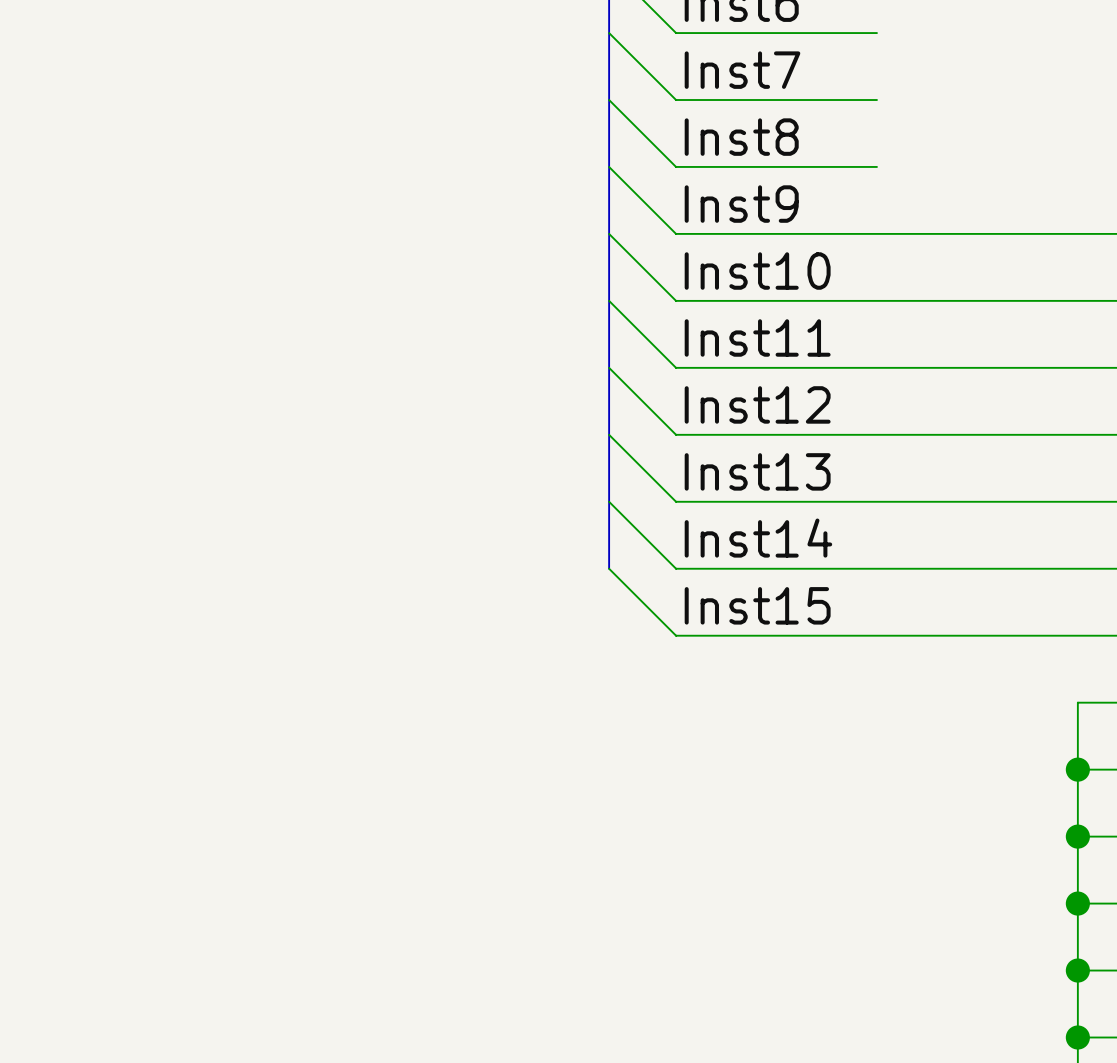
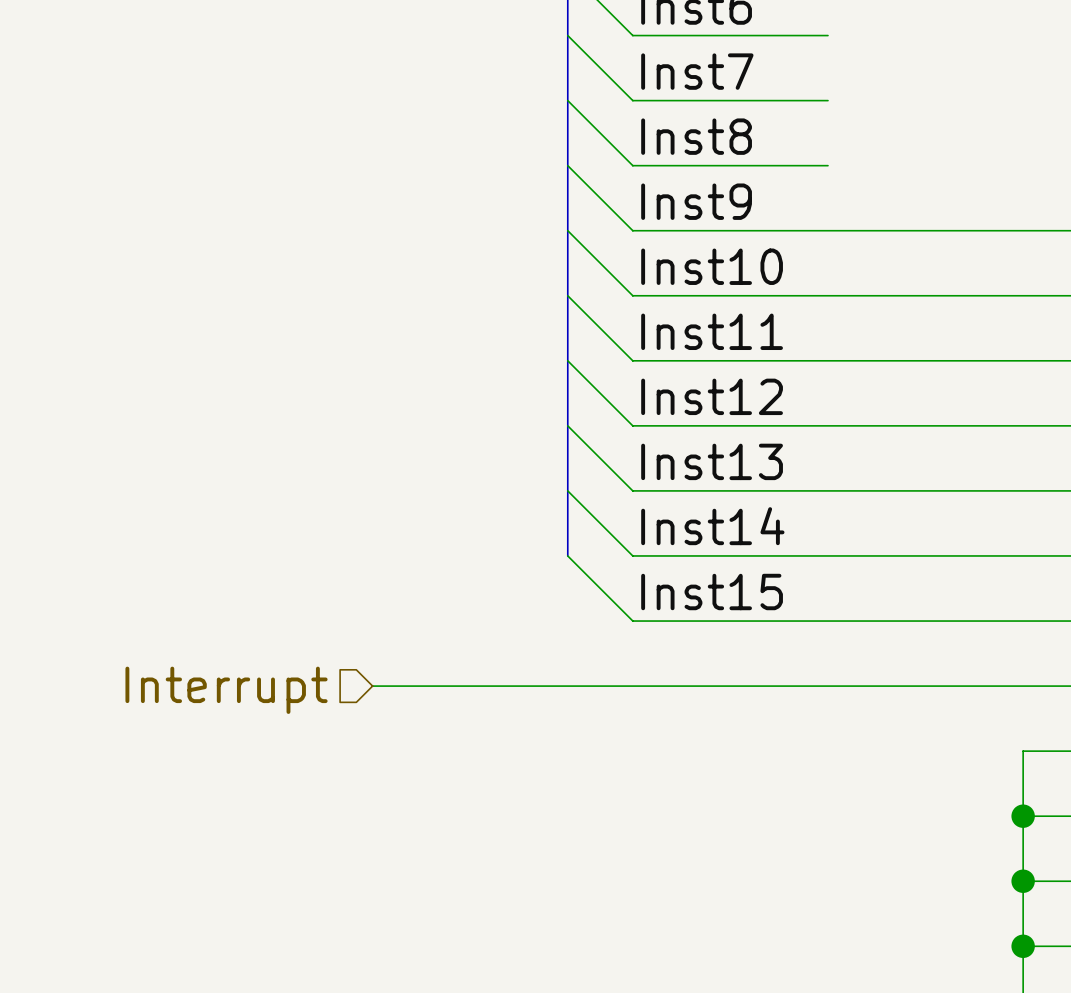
wire: (1077, 702) (1077, 769) -> (1023, 686) (372, 686)
hierarchical label: none -> Interrupt (226, 690)
junction: (1077, 769) -> none

